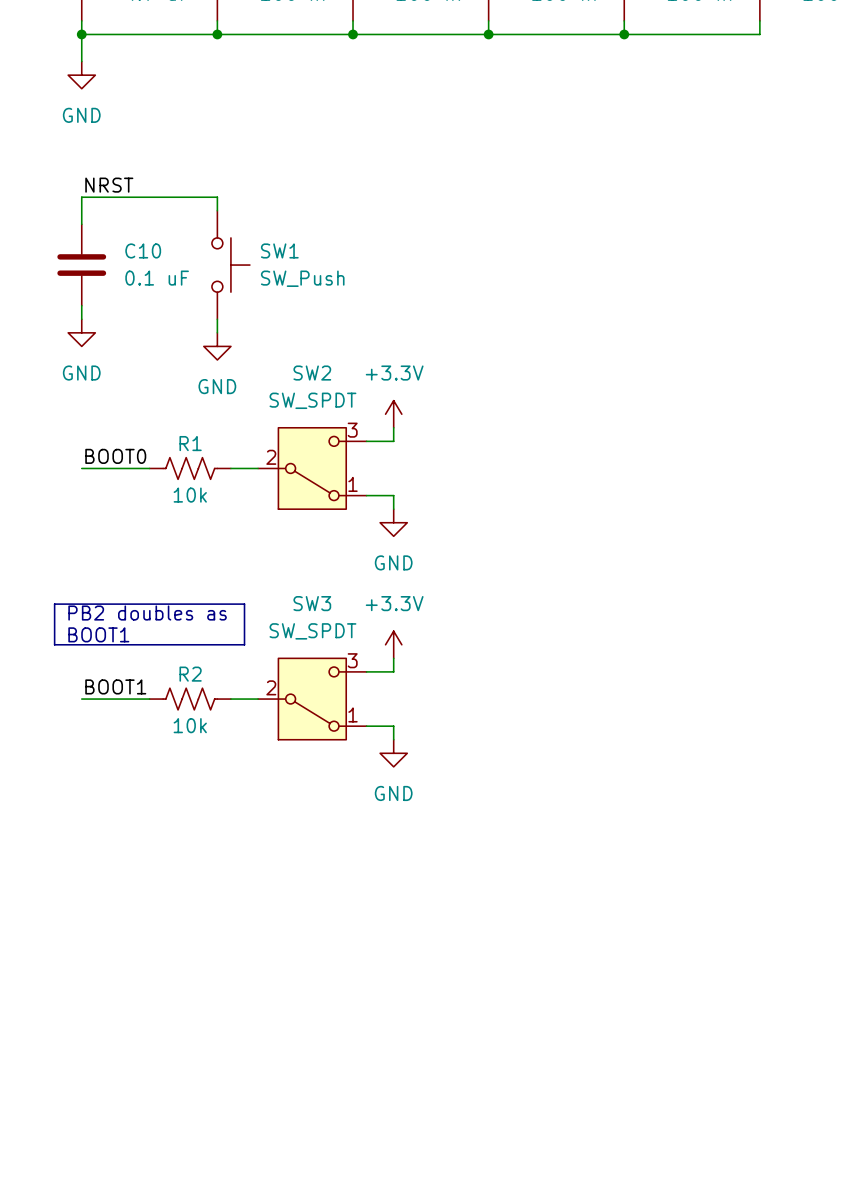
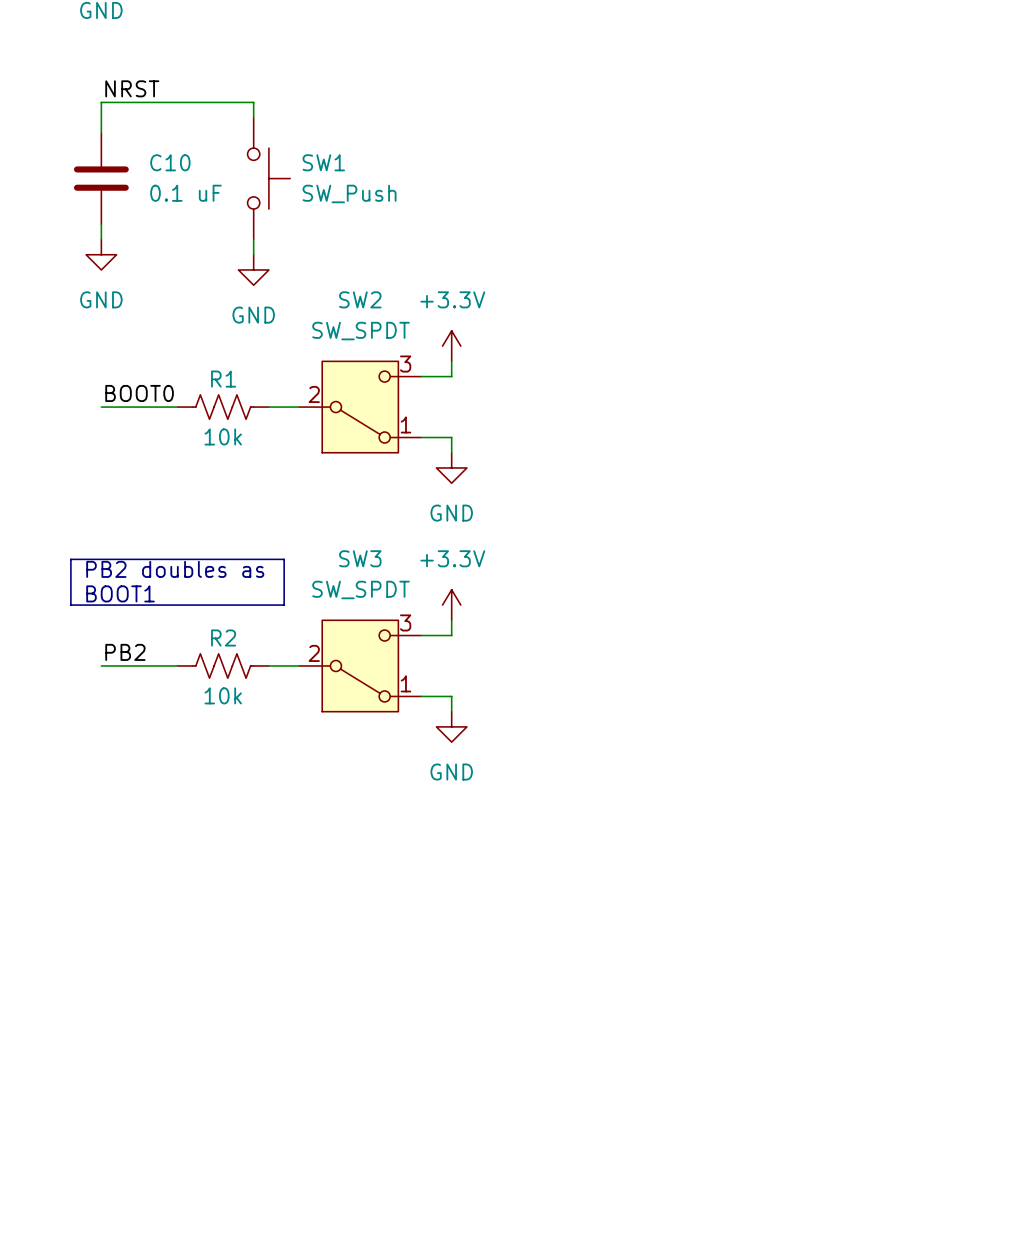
label: BOOT1 (115, 686) -> PB2 (125, 652)

